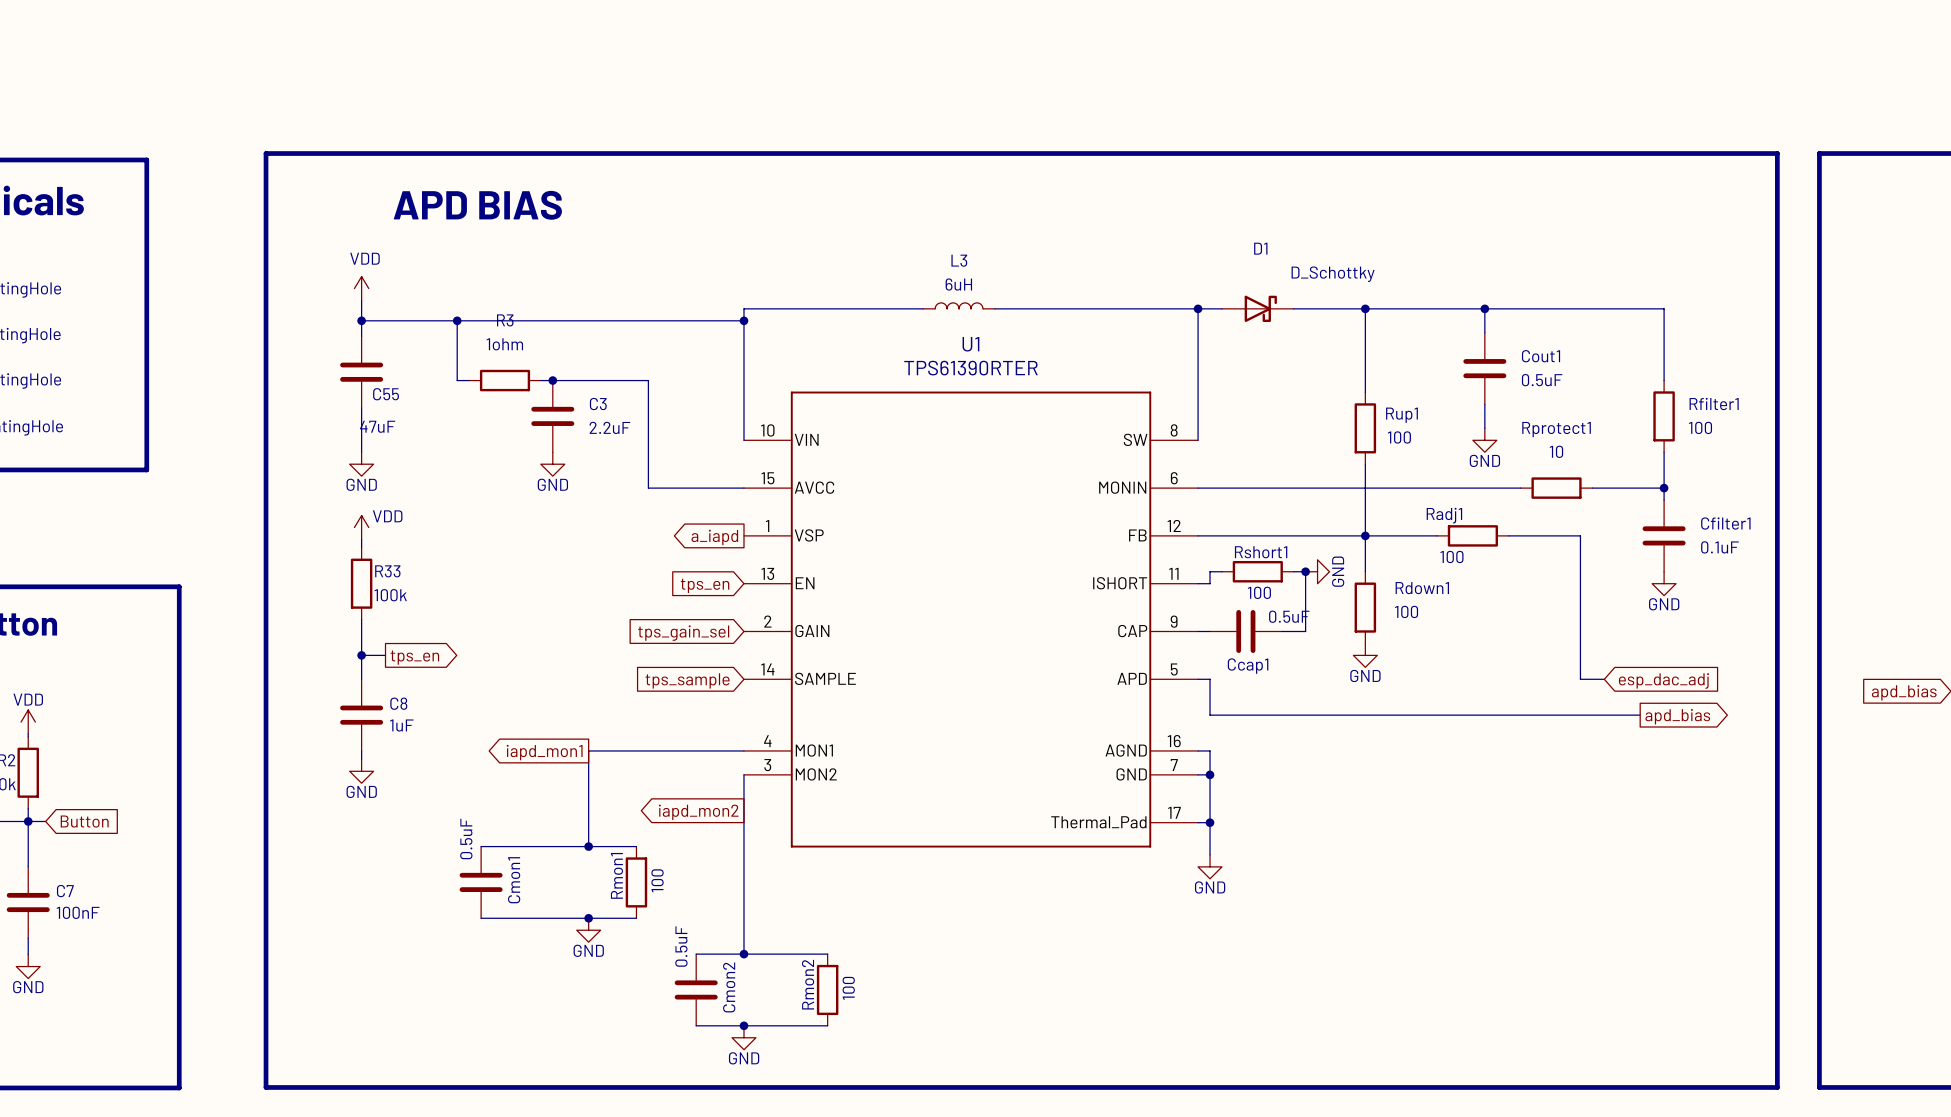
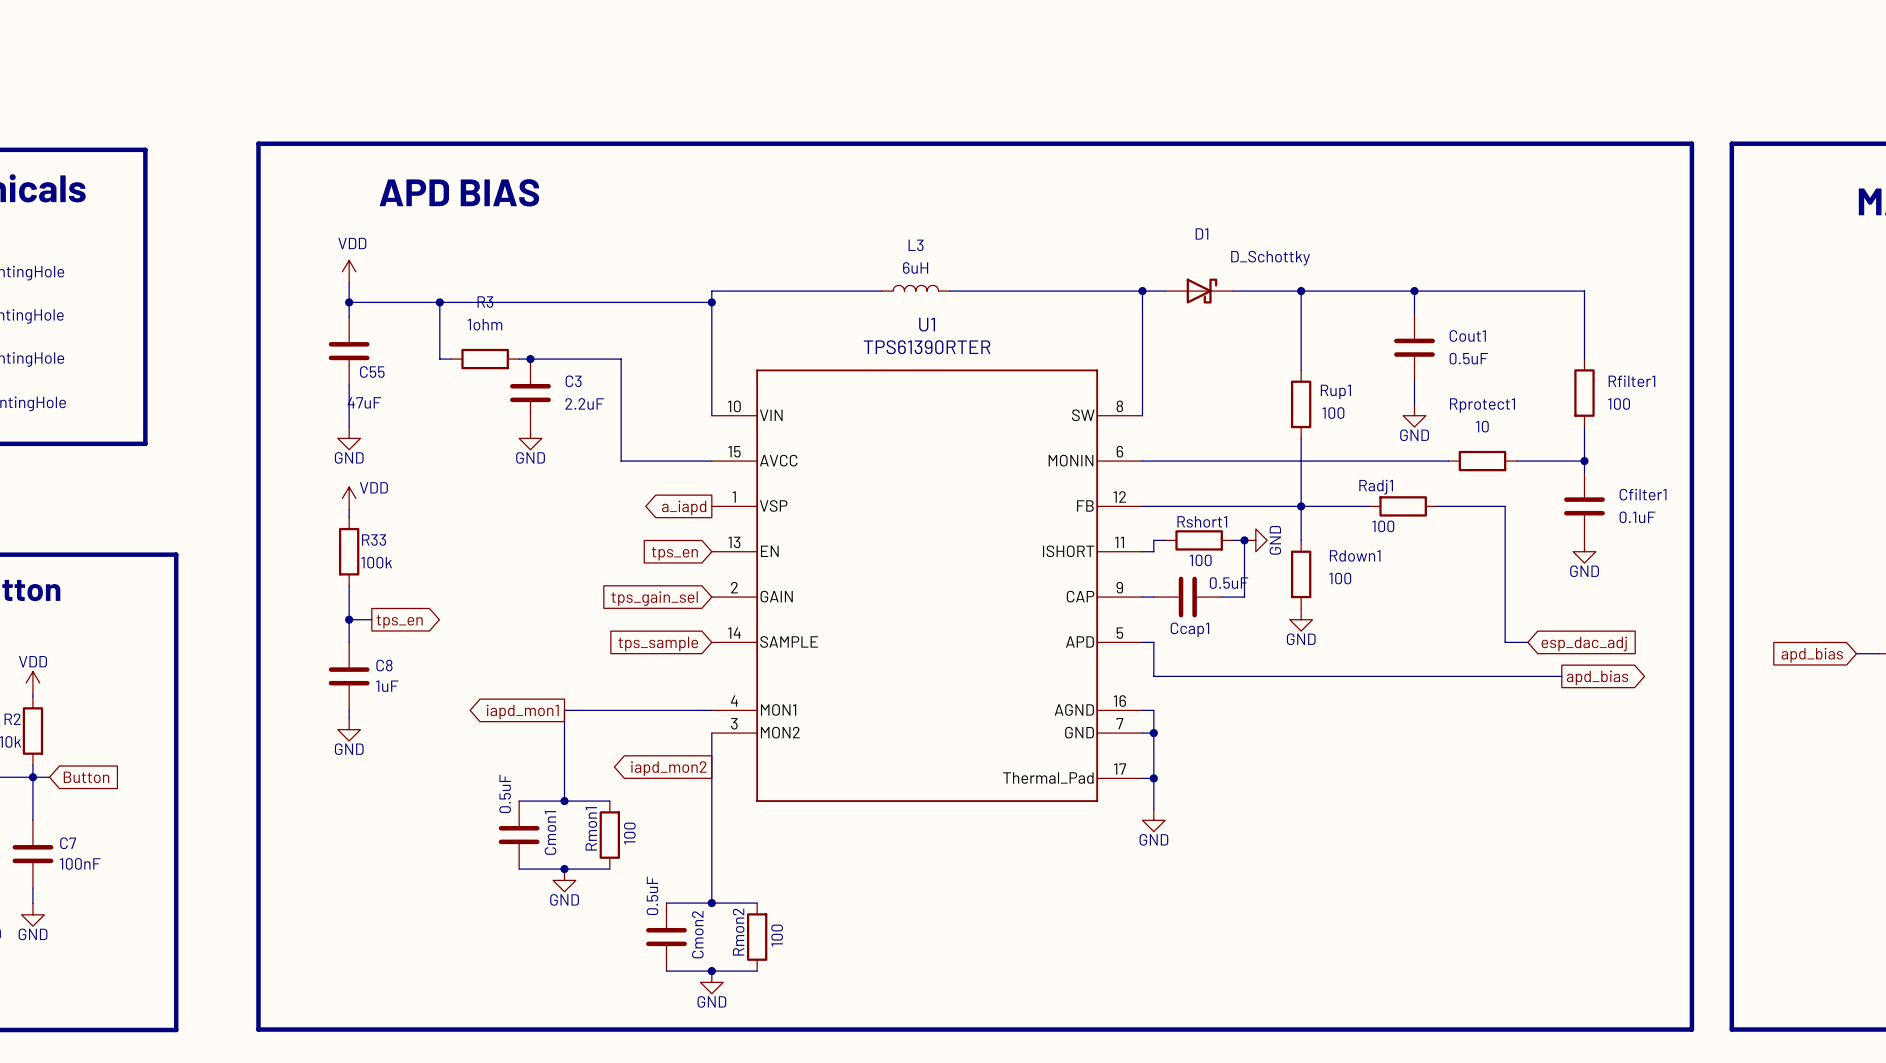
wire: (481, 846) (540, 846) -> none
Cmon1 position: (481, 882) -> (519, 835)
wire: (481, 918) (540, 918) -> none
wire: (791, 954) (827, 954) -> none
Rmon2 position: (827, 989) -> (757, 937)
wire: (791, 1025) (827, 1025) -> none

